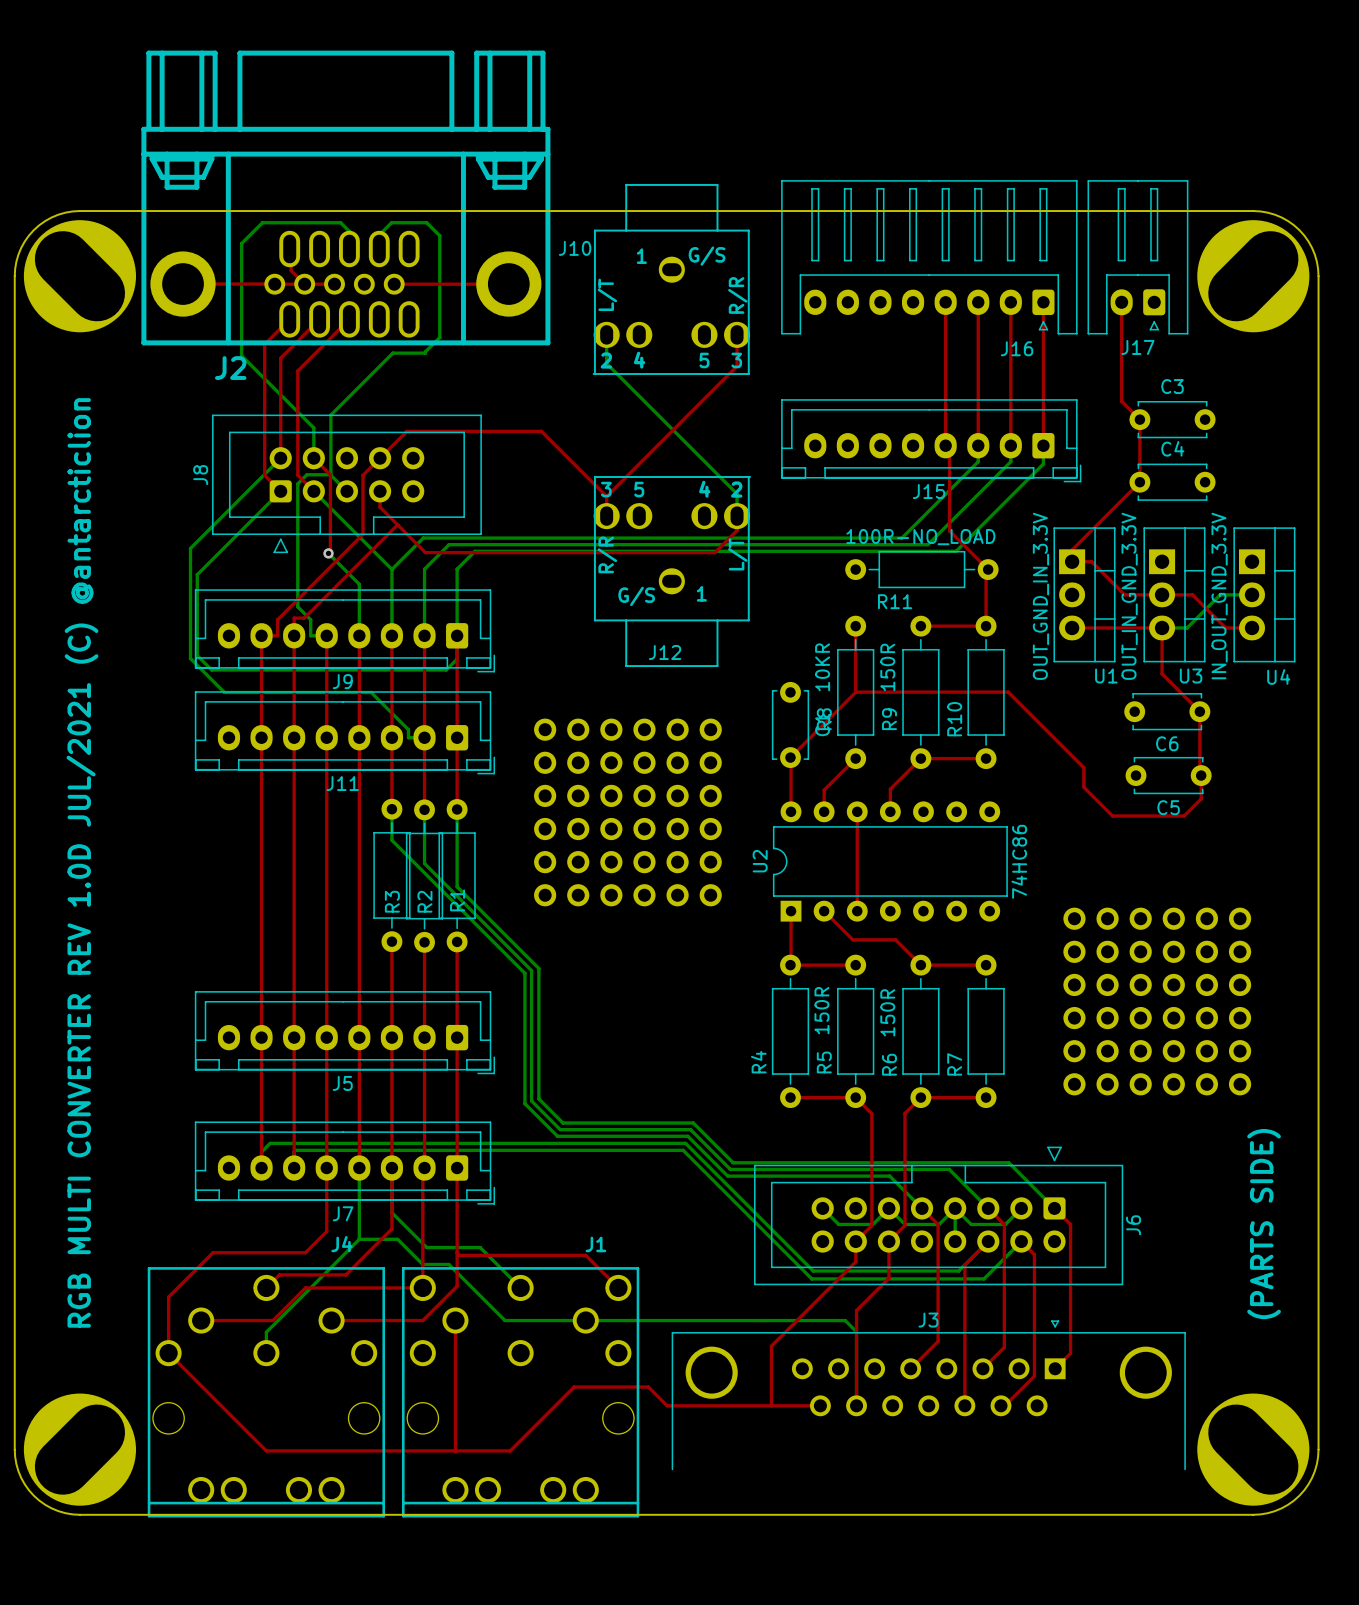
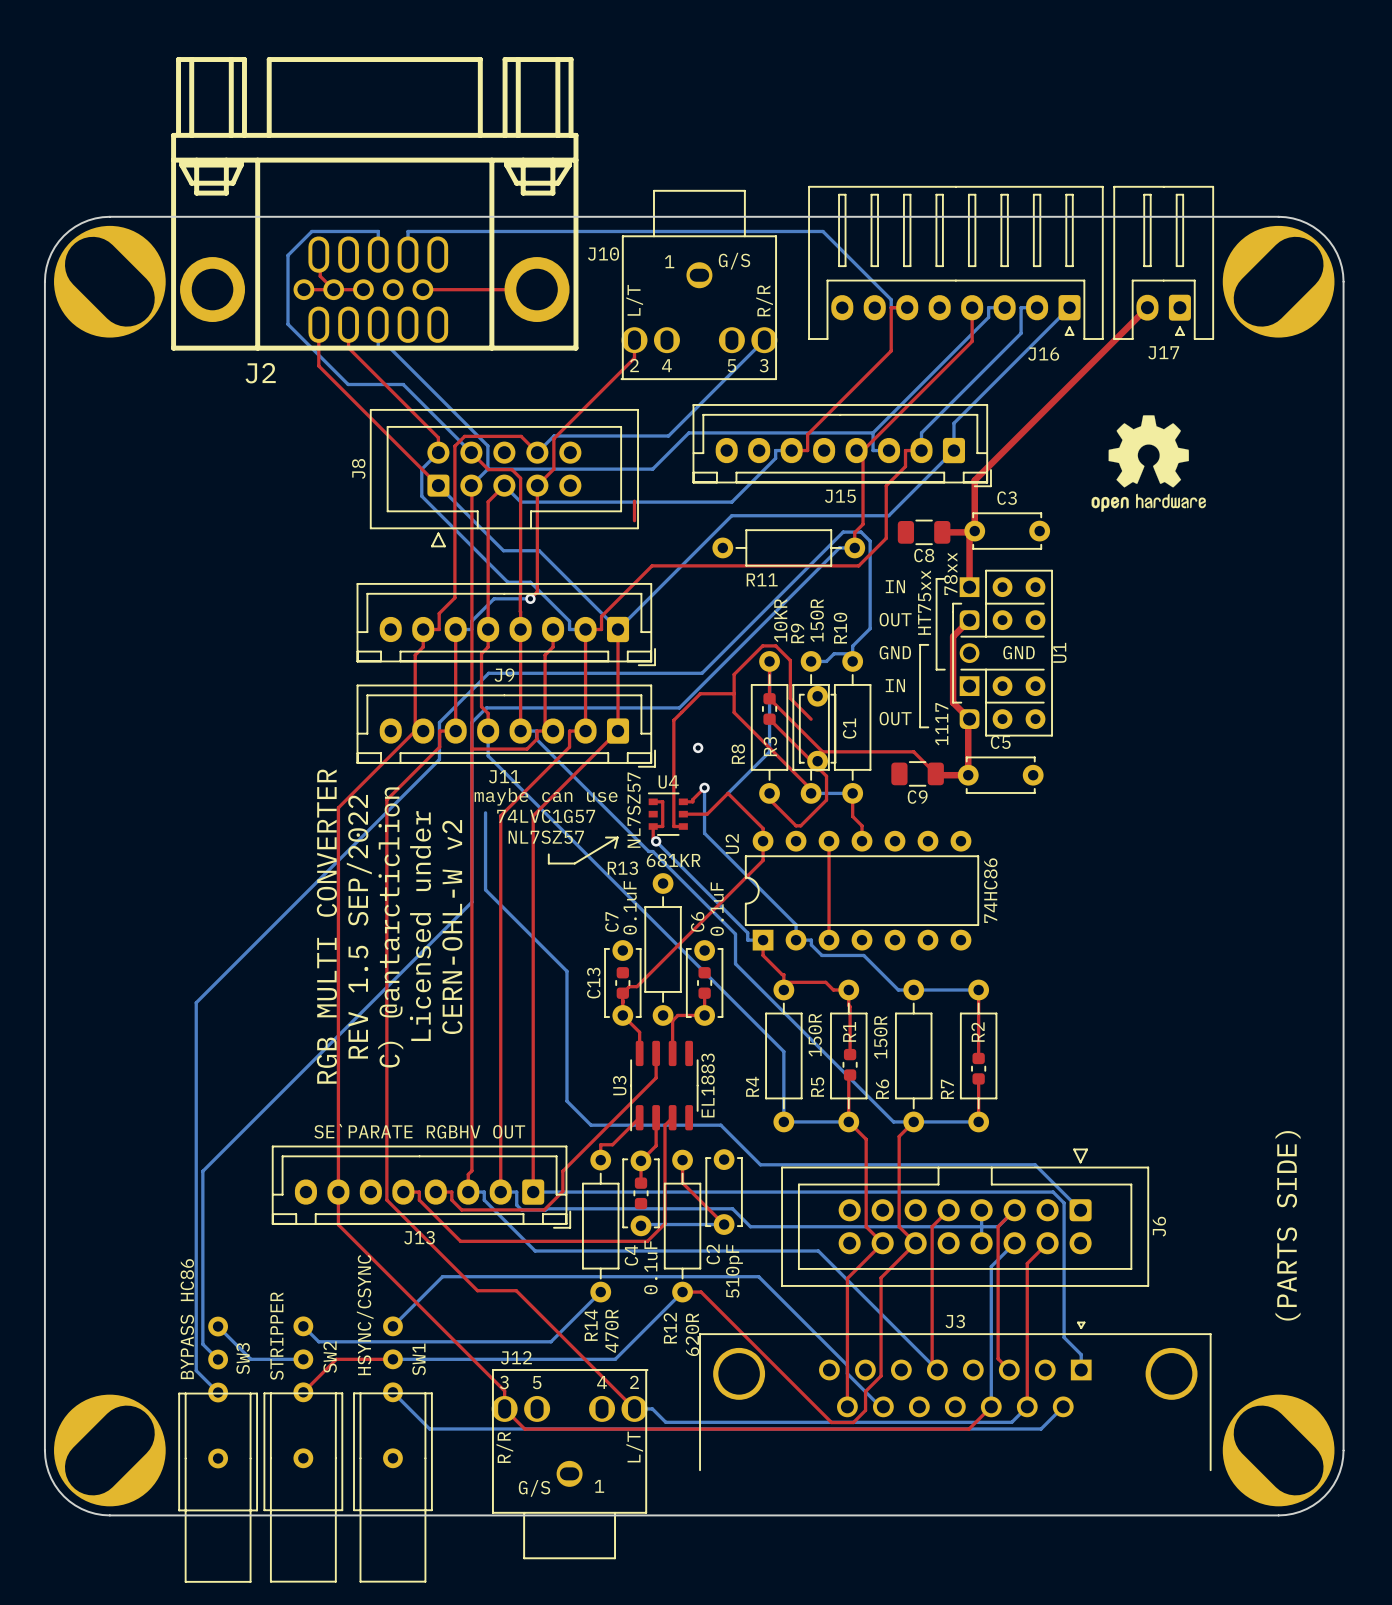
bottom track: (349, 231) (340, 222) (262, 222) (241, 243) (241, 355) (313, 427) (313, 458) -> (378, 237) (378, 231) (311, 231) (288, 255) (288, 324) (348, 384) (403, 384) (471, 452)
bottom track: (379, 235) (391, 222) (426, 222) (439, 235) (439, 337) (425, 353) (392, 353) (330, 415) (330, 475) (346, 491) -> (408, 240) (408, 231) (823, 231) (891, 299) (891, 307) (907, 307)
top track: (183, 284) (274, 284) -> none
top track: none -> (907, 307) (891, 307) (891, 350) (807, 434) (807, 450) (791, 450)
top track: (978, 302) (978, 445) -> none
bottom track: none -> (1004, 307) (988, 307) (988, 317) (873, 432)
top track: (1010, 302) (1010, 445) -> none
bottom track: none -> (1037, 307) (1021, 307) (1021, 333) (921, 432) (921, 450)
top track: (1043, 302) (1043, 445) -> none
bottom track: none -> (1069, 307) (953, 423) (953, 450) (888, 515) (731, 515) (618, 629) (539, 550) (503, 550) (438, 485)
top track: (1121, 302) (1121, 401) (1139, 419) (1139, 482) (1072, 550) (1072, 561) (1091, 561) (1124, 594) (1192, 594) (1225, 627) (1252, 627) -> (1147, 307) (974, 480) (974, 531) (969, 536) (969, 587)
top track: (289, 319) (264, 344) (264, 475) (280, 491) -> (318, 324) (318, 366) (438, 485)
top track: (319, 319) (280, 358) (280, 458) -> (348, 324) (348, 347) (438, 437) (438, 452)
top track: (349, 319) (297, 371) (297, 475) (313, 491) -> none
bottom track: none -> (378, 324) (378, 347) (389, 347) (487, 445) (487, 469)
top track: none -> (634, 340) (634, 358) (553, 438) (553, 469) (537, 485) (537, 591) (530, 598)
bottom track: (606, 334) (606, 363) (737, 493) (737, 516) -> none
top track: (737, 334) (737, 366) (606, 496) (541, 431) (406, 431) (363, 475) (363, 534) (277, 619) (277, 635) (261, 635) (261, 1168) -> none
bottom track: none -> (764, 340) (668, 435) (554, 435) (537, 452)
top track: (945, 336) (945, 445) (949, 449) (949, 530) (988, 569) (986, 571) (986, 626) (920, 626) -> (972, 341) (863, 450)
drawing: none -> [1091, 415, 1206, 513]
C3 position: (1172, 419) -> (1007, 531)
bottom track: none -> (873, 432) (688, 432) (652, 469) (487, 469)
bottom track: none -> (873, 432) (873, 450) (889, 450)
J15 position: (931, 440) -> (842, 445)
bottom track: none -> (791, 450) (775, 450) (775, 458) (731, 502) (520, 502) (504, 485)
top track: none -> (863, 450) (863, 524) (854, 532) (854, 547)
top track: none -> (921, 450) (905, 450) (905, 466) (886, 485) (886, 538) (858, 565) (652, 565) (601, 616) (601, 629) (585, 629) (585, 731) (569, 731) (569, 747) (500, 815) (500, 1192)
bottom track: (978, 445) (978, 461) (901, 538) (423, 538) (391, 569) -> none
bottom track: (1010, 445) (1010, 461) (927, 544) (449, 544) (424, 569) (424, 635) -> none
bottom track: (1043, 445) (1043, 463) (956, 551) (474, 551) (457, 569) (457, 659) (446, 669) (211, 669) (197, 655) (197, 574) (280, 491) -> none
bottom track: none -> (438, 452) (421, 469) (421, 496) (507, 582) (530, 582) (569, 621) (569, 629) (585, 629)
top track: none -> (471, 452) (488, 469) (512, 469) (520, 478) (520, 731)
C4 name position: C4 (1172, 448) -> C4 (631, 1255)
bottom track: (280, 458) (190, 548) (190, 658) (224, 692) (371, 692) (408, 729) (408, 737) (424, 737) -> none
top track: (313, 458) (330, 474) (330, 551) (328, 553) -> none
bottom track: none -> (487, 469) (471, 485)
bottom track: (330, 474) (306, 474) (297, 483) (297, 606) (310, 619) (310, 635) (326, 635) -> none
top track: none -> (471, 485) (471, 1170) (468, 1174) (468, 1192)
top track: none -> (504, 485) (488, 501) (488, 647) (481, 653) (481, 706) (488, 713) (488, 731)
C4 rotation: 0° (1172, 482) -> 90° clockwise (641, 1193)
C4 position: (1172, 482) -> (641, 1193)
J8 position: (346, 483) -> (504, 478)
bottom track: (313, 491) (391, 569) -> none
top track: (380, 491) (380, 507) (397, 524) -> none
top track: (737, 516) (737, 530) (714, 552) (425, 552) (397, 524) -> none
top track: (397, 524) (304, 618) (294, 618) (294, 1168) -> none
C8: none -> (924, 532)
top track: none -> (942, 532) (973, 532)
U1 footprint: [1053, 527, 1116, 663] -> [919, 569, 1053, 737]
U3 footprint: [1143, 527, 1206, 663] -> [630, 1040, 699, 1132]
U4 footprint: [1233, 527, 1296, 663] -> [648, 792, 688, 836]
R11 value: 100R-NO_LOAD (920, 537) -> none
bottom track: none -> (854, 547) (839, 547) (679, 707) (486, 707) (471, 722) (471, 902) (202, 1171) (202, 1344) (218, 1359)
bottom track: (328, 553) (359, 584) (359, 635) -> none
via: (328, 553) -> none
bottom track: (391, 569) (391, 635) -> none
R11 position: (921, 569) -> (788, 547)
J12 position: (672, 571) -> (570, 1464)
bottom track: none -> (530, 598) (494, 598) (471, 621) (471, 629) (455, 629)
via: none -> (530, 598)
bottom track: (1252, 594) (1220, 594) (1187, 627) (1162, 627) -> none
U1 value: OUT_GND_IN_3.3V (1040, 596) -> none
U3 value: OUT_IN_GND_3.3V (1129, 596) -> EL1883 (708, 1085)
U4 value: IN_OUT_GND_3.3V (1219, 596) -> NL7SZ57 (634, 810)
top track: none -> (969, 620) (953, 636) (953, 702) (969, 719) (968, 775) (937, 775) (913, 751) (822, 751) (769, 698) (769, 661)
top track: none -> (455, 629) (455, 731) (439, 731) (439, 747) (386, 799) (386, 1200) (477, 1290) (516, 1290) (634, 1408)
top track: none -> (553, 629) (553, 647) (545, 655) (545, 731)
top track: none -> (618, 629) (618, 731) (533, 815) (533, 1192)
top track: (855, 626) (855, 692) (790, 757) (791, 811) -> none
top track: (1072, 627) (1162, 627) (1162, 673) (1199, 711) (1201, 799) (1184, 815) (1112, 815) (1083, 787) (1083, 767) (1008, 692) (855, 692) -> none
J9 position: (344, 630) -> (506, 624)
top track: (326, 635) (326, 1231) (305, 1252) (212, 1252) (168, 1297) (168, 1353) (266, 1450) (510, 1450) (574, 1387) (648, 1387) (667, 1405) (820, 1405) -> (850, 1075) (848, 1121) (866, 1139) (866, 1226) (882, 1243) (847, 1278) (847, 1406)
top track: (359, 635) (359, 1168) -> none
top track: (391, 635) (391, 809) -> none
top track: (424, 635) (424, 809) -> none
top track: (457, 635) (457, 809) -> none
bottom track: none -> (852, 653) (834, 653) (826, 661) (811, 661)
J12 name position: J12 (665, 652) -> J12 (516, 1357)
bottom track: none -> (769, 661) (769, 751) (728, 793)
bottom track: none -> (852, 661) (852, 646) (870, 628) (870, 541) (861, 532) (843, 532) (702, 673) (488, 673) (439, 722) (439, 759) (196, 1002) (196, 1370) (218, 1392)
R8 value position: 10KR (822, 667) -> 10KR (780, 620)
R9 value position: 150R (887, 667) -> 150R (817, 620)
U1 name position: U1 (1106, 675) -> U1 (1059, 652)
U3 name position: U3 (1191, 675) -> U3 (619, 1085)
U4 name position: U4 (1278, 676) -> U4 (668, 781)
top track: none -> (734, 693) (700, 693) (673, 720) (673, 826) (683, 826)
R8 position: (855, 692) -> (769, 727)
R9 position: (920, 692) -> (811, 727)
R10 position: (986, 692) -> (852, 727)
C6 rotation: 0° (1167, 711) -> 90° clockwise (704, 982)
C6 position: (1167, 711) -> (704, 982)
top track: none -> (769, 719) (826, 776) (826, 800) (800, 825) (796, 825) (769, 799) (769, 793)
top track: none -> (811, 719) (790, 698) (790, 660) (775, 645) (762, 645) (734, 674) (734, 712) (811, 789) (811, 793)
R9 name position: R9 (889, 719) -> R9 (797, 633)
R10 name position: R10 (954, 719) -> R10 (840, 628)
bottom track: none -> (488, 731) (488, 755) (783, 1051) (783, 1121) (848, 1121)
bottom track: none -> (520, 731) (536, 731) (536, 739) (648, 851) (652, 851) (735, 934) (735, 963) (893, 1121) (978, 1121)
top track: none -> (553, 731) (537, 731) (537, 739) (527, 749) (471, 749)
part: (545, 729) -> none
part: (578, 729) -> none
part: (611, 729) -> none
part: (644, 729) -> none
part: (677, 729) -> none
part: (710, 729) -> none
J11 position: (344, 732) -> (506, 726)
C6 name position: C6 (1167, 743) -> C6 (697, 921)
via: none -> (698, 747)
top track: (855, 758) (824, 790) (824, 811) -> none
top track: (986, 758) (920, 758) (890, 789) (890, 811) -> none
part: (545, 762) -> none
part: (578, 762) -> none
part: (611, 762) -> none
part: (644, 762) -> none
part: (677, 762) -> none
part: (710, 762) -> none
C9: none -> (917, 773)
C5 position: (1168, 775) -> (1000, 775)
top track: none -> (704, 787) (692, 801) (683, 801)
bottom track: none -> (704, 787) (704, 833) (796, 924) (796, 940) (811, 940) (811, 944) (821, 955) (863, 955) (898, 990) (978, 990)
via: none -> (704, 787)
bottom track: none -> (811, 793) (852, 793)
top track: none -> (852, 793) (852, 816) (862, 825) (862, 841)
text: none -> maybe can use (546, 796)
part: (545, 795) -> none
part: (578, 795) -> none
part: (611, 795) -> none
part: (644, 795) -> none
part: (677, 795) -> none
part: (710, 795) -> none
R3 footprint: [373, 798, 411, 953] -> [762, 693, 777, 725]
top track: none -> (653, 801) (662, 801) (662, 826) (653, 826) (653, 838) (656, 841)
R2 footprint: [405, 799, 444, 953] -> [971, 1052, 987, 1085]
R1 footprint: [438, 799, 476, 953] -> [842, 1048, 858, 1081]
C5 name position: C5 (1168, 807) -> C5 (1000, 742)
bottom track: (391, 809) (391, 840) (524, 973) (524, 1103) (557, 1136) (687, 1136) (727, 1176) (889, 1176) (922, 1208) -> none
bottom track: (424, 809) (424, 863) (531, 970) (531, 1100) (560, 1129) (690, 1129) (730, 1169) (949, 1169) (988, 1208) -> (500, 1192) (516, 1192) (516, 1205) (521, 1210) (732, 1208) (750, 1226) (998, 1226) (1014, 1210)
top track: none -> (683, 814) (707, 814) (728, 793) (763, 828) (763, 860) (636, 986) (629, 986) (622, 993) (622, 1015) (639, 1032) (639, 1053)
top track: (857, 811) (857, 911) -> (829, 841) (829, 940)
text: none -> 74LVC1G57 (546, 816)
part: (545, 829) -> none
part: (578, 829) -> none
part: (611, 829) -> none
part: (644, 829) -> none
part: (677, 829) -> none
part: (710, 829) -> none
text: none -> NL7SZ57 (546, 837)
line: none -> (605, 837) (617, 837)
line: none -> (617, 837) (615, 847)
line: none -> (617, 837) (574, 863) (548, 863) (548, 854)
bottom track: none -> (656, 841) (747, 932) (747, 940) (763, 940)
via: none -> (656, 841)
U2 name position: U2 (760, 861) -> U2 (732, 843)
U2 position: (890, 861) -> (862, 890)
text: RGB MULTI CONVERTER REV 1.0D JUL/2021 (C) @antarcticlion (81, 862) -> none
part: (545, 862) -> none
part: (578, 862) -> none
part: (611, 862) -> none
part: (644, 862) -> none
part: (677, 862) -> none
part: (710, 862) -> none
part: (545, 895) -> none
part: (578, 895) -> none
part: (611, 895) -> none
part: (644, 895) -> none
part: (677, 895) -> none
part: (710, 895) -> none
R1 name position: R1 (457, 900) -> R1 (849, 1031)
R2 name position: R2 (424, 901) -> R2 (978, 1032)
C6 value: none -> 0.1uF (717, 909)
top track: (791, 911) (790, 965) (855, 965) -> none
top track: (824, 911) (852, 939) (895, 939) (920, 965) (986, 965) -> none
part: (1074, 918) -> none
part: (1107, 918) -> none
part: (1140, 918) -> none
part: (1173, 918) -> none
part: (1206, 918) -> none
part: (1240, 918) -> none
text: none -> Licensed under (420, 926)
text: none -> RGB MULTI CONVERTER (326, 926)
text: none -> REV 1.5 SEP/2022 (359, 926)
text: none -> C) @antarcticlion (390, 927)
text: none -> CERN-OHL-W v2 (452, 927)
top track: none -> (763, 940) (763, 955) (783, 974) (783, 990)
top track: (391, 941) (391, 1228) (345, 1274) (279, 1274) (266, 1287) -> none
top track: (457, 941) (457, 1286) (422, 1320) (331, 1320) -> none
top track: (424, 942) (422, 1287) (305, 1287) (272, 1320) (201, 1320) -> none
R13: none -> 681KR (663, 949)
part: (1074, 951) -> none
part: (1107, 951) -> none
part: (1140, 951) -> none
part: (1173, 951) -> none
part: (1206, 951) -> none
part: (1240, 951) -> none
top track: none -> (783, 982) (825, 982) (833, 990) (848, 990) (850, 1054)
C13: none -> (622, 982)
C7: none -> 0.1uF (622, 982)
part: none -> (704, 982)
part: (1074, 984) -> none
part: (1107, 984) -> none
part: (1140, 984) -> none
part: (1173, 984) -> none
part: (1206, 984) -> none
part: (1240, 984) -> none
top track: none -> (978, 990) (978, 1058)
top track: none -> (704, 993) (704, 1015) (677, 1015) (672, 1020)
top track: none -> (672, 1020) (672, 1053)
part: (1074, 1018) -> none
part: (1107, 1018) -> none
part: (1140, 1018) -> none
part: (1173, 1018) -> none
part: (1206, 1018) -> none
part: (1240, 1018) -> none
R4 position: (790, 1031) -> (783, 1055)
R5 position: (855, 1031) -> (848, 1055)
R6 position: (920, 1031) -> (913, 1055)
R7 position: (986, 1031) -> (978, 1055)
J5: (344, 1032) -> none
top track: none -> (656, 1053) (656, 1077) (562, 1171) (562, 1191) (544, 1209) (461, 1209) (451, 1200) (451, 1192) (435, 1192)
part: (1074, 1051) -> none
part: (1107, 1051) -> none
part: (1140, 1051) -> none
part: (1173, 1051) -> none
part: (1206, 1051) -> none
part: (1240, 1051) -> none
top track: none -> (978, 1078) (978, 1121)
part: (1074, 1084) -> none
part: (1107, 1084) -> none
part: (1140, 1084) -> none
part: (1173, 1084) -> none
part: (1206, 1084) -> none
part: (1240, 1084) -> none
top track: (790, 1097) (855, 1097) (871, 1113) (871, 1225) (855, 1241) (855, 1261) (771, 1346) (771, 1405) -> none
top track: (986, 1097) (920, 1097) (904, 1113) (904, 1225) (888, 1241) (888, 1278) (856, 1310) (856, 1405) -> none
top track: none -> (639, 1117) (612, 1144) (600, 1144) (600, 1160)
top track: none -> (656, 1117) (656, 1145) (641, 1160) (641, 1183)
top track: none -> (672, 1117) (664, 1125) (664, 1223) (647, 1241) (460, 1241) (419, 1200) (419, 1192) (403, 1192)
top track: none -> (913, 1121) (899, 1136) (899, 1226) (915, 1243) (881, 1277) (881, 1376) (865, 1391) (865, 1410) (853, 1422) (831, 1422) (701, 1292) (682, 1292)
top track: none -> (682, 1160) (682, 1182) (724, 1224)
J7: (344, 1163) -> none
bottom track: (261, 1168) (261, 1151) (270, 1143) (685, 1143) (813, 1271) (958, 1271) (964, 1264) -> (991, 1406) (991, 1266)
bottom track: (294, 1168) (294, 1151) (295, 1150) (683, 1150) (811, 1278) (984, 1278) (1021, 1241) -> none
bottom track: (359, 1168) (359, 1239) -> none
bottom track: (391, 1168) (391, 1212) (426, 1247) (480, 1247) (520, 1287) -> none
J13: none -> SE`PARATE RGBHV OUT (421, 1187)
bottom track: none -> (468, 1192) (484, 1192) (484, 1200) (535, 1251) (818, 1251) (937, 1369)
bottom track: none -> (533, 1192) (1053, 1192) (1064, 1203) (1064, 1337) (1081, 1354) (1081, 1369)
C2: none -> 510pF (724, 1192)
part: none -> (641, 1193)
bottom track: (822, 1208) (838, 1224) (872, 1224) (888, 1208) (904, 1224) (939, 1224) (955, 1208) (971, 1224) (1005, 1224) (1021, 1208) -> none
top track: (922, 1208) (938, 1224) (938, 1341) (910, 1368) -> (948, 1210) (932, 1226) (932, 1364) (937, 1369)
top track: (988, 1208) (1004, 1224) (1004, 1347) (982, 1368) -> (1014, 1210) (998, 1226) (998, 1358) (1009, 1369)
top track: (1054, 1208) (1070, 1224) (1070, 1353) (1055, 1368) -> none
bottom track: none -> (724, 1224) (641, 1225)
R14: none -> 470R (600, 1226)
R12: none -> 620R (682, 1226)
bottom track: (359, 1239) (397, 1239) (422, 1264) (448, 1264) (504, 1320) (845, 1320) (856, 1331) (856, 1405) -> (392, 1326) (442, 1276) (758, 1276) (847, 1365) (847, 1373) (880, 1406) (883, 1406)
bottom track: (359, 1239) (266, 1332) (266, 1353) -> none
top track: (988, 1241) (964, 1264) (964, 1405) -> (537, 452) (521, 436) (464, 436) (454, 446) (454, 597) (439, 613) (439, 629) (423, 629) (423, 647) (415, 655) (415, 731) (338, 807) (338, 1224) (504, 1391) (504, 1408) (524, 1429) (969, 1429) (991, 1406)
top track: (1021, 1241) (1034, 1254) (1034, 1376) (1004, 1405) (1000, 1405) -> (1047, 1243) (1027, 1263) (1027, 1406)
top track: (457, 1253) (459, 1255) (585, 1255) (618, 1287) -> none
C4 value: none -> 0.1uF (650, 1267)
bottom track: none -> (600, 1292) (550, 1341) (318, 1341) (303, 1326)
bottom track: none -> (682, 1292) (615, 1359) (392, 1359)
bottom track: none -> (218, 1326) (250, 1359) (303, 1359)
top track: (460, 1325) (455, 1320) (455, 1450) -> none
top track: none -> (392, 1359) (336, 1359) (303, 1392)
bottom track: none -> (392, 1392) (429, 1428) (1041, 1428) (1063, 1406)
J4: (266, 1392) -> none
J1: (520, 1392) -> none
bottom track: none -> (1027, 1406) (1011, 1422) (665, 1422) (652, 1408) (634, 1408)
SW3: none -> BYPASS HC86 (218, 1449)
SW2: none -> STRIPPER (303, 1449)
SW1: none -> HSYNC/CSYNC (392, 1449)

